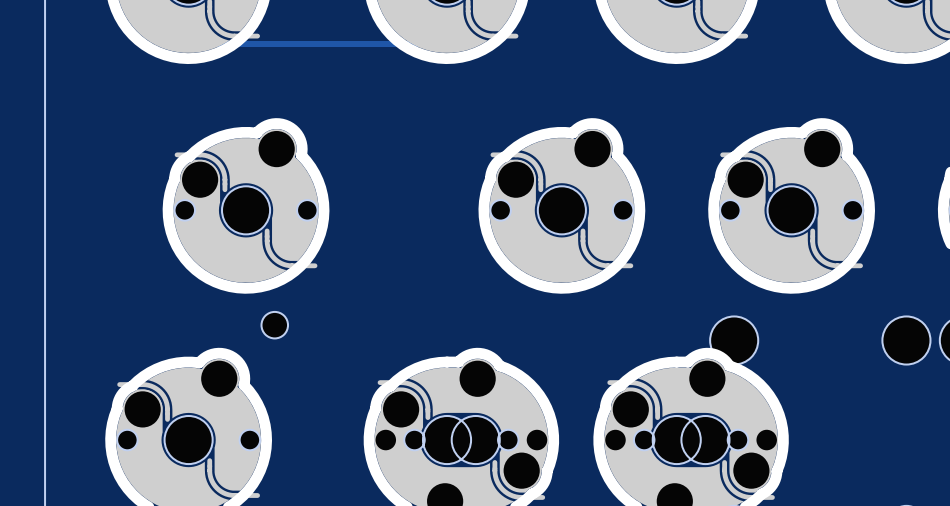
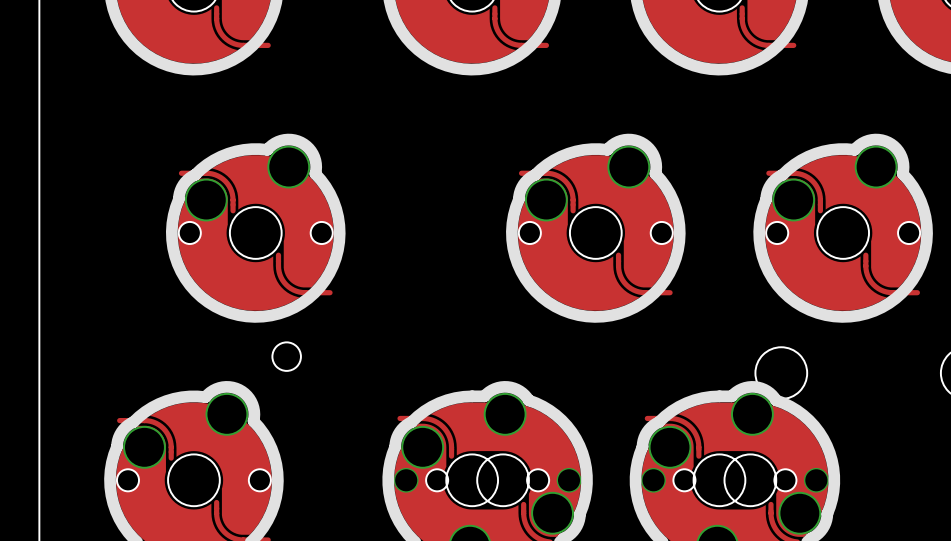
track: (198, 44) (451, 44) -> none

